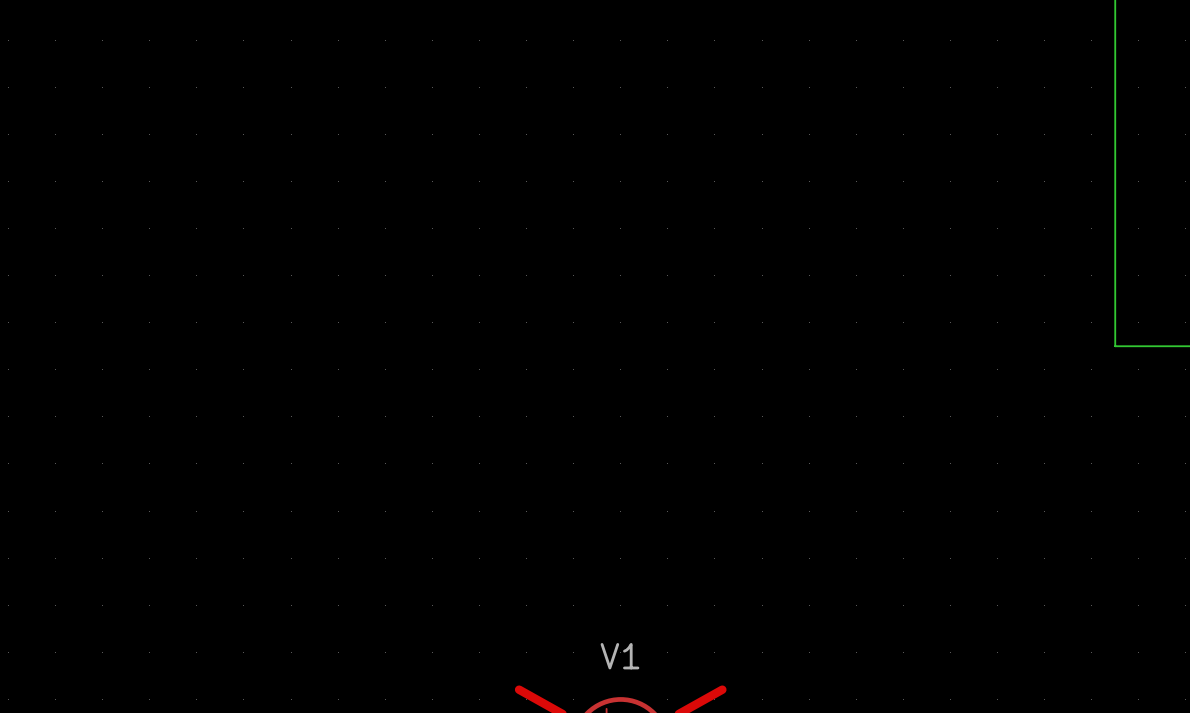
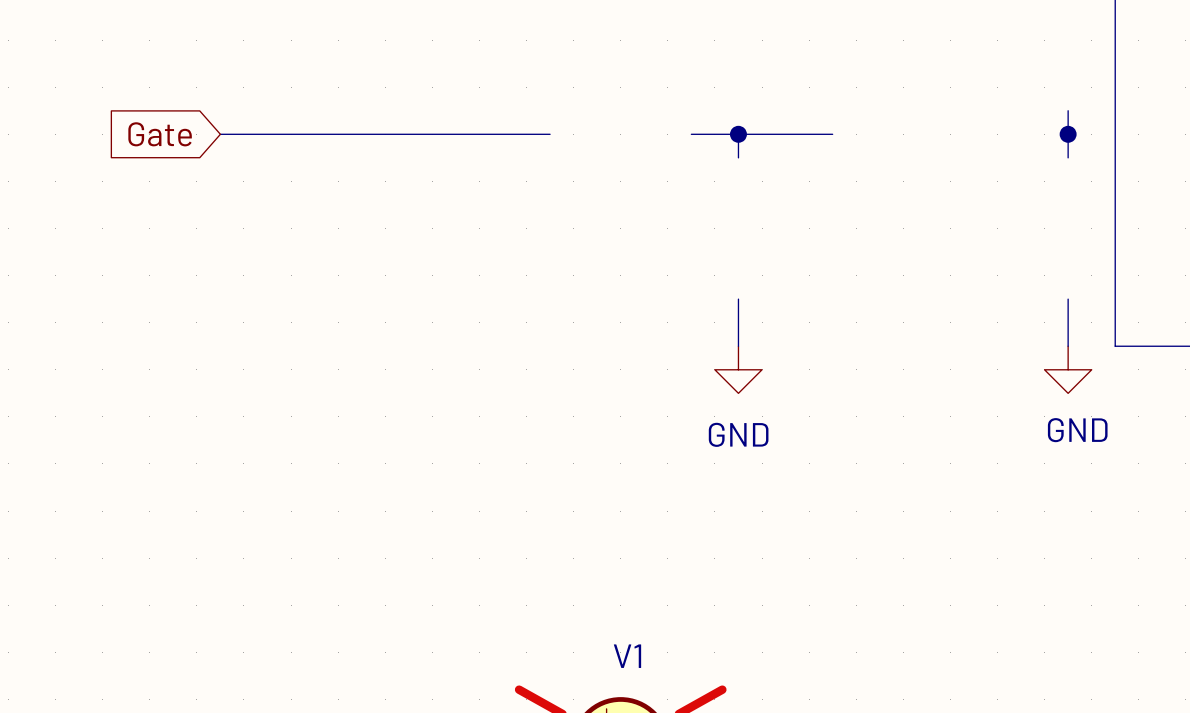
wire: none -> (1068, 110) (1068, 157)
global label: none -> Gate (160, 134)
wire: none -> (220, 134) (550, 134)
wire: none -> (691, 134) (832, 134)
wire: none -> (738, 134) (738, 157)
junction: none -> (738, 134)
junction: none -> (1068, 134)
wire: none -> (738, 299) (738, 346)
wire: none -> (1068, 299) (1068, 346)
power symbol: none -> GND (738, 369)
power symbol: none -> GND (1068, 369)

